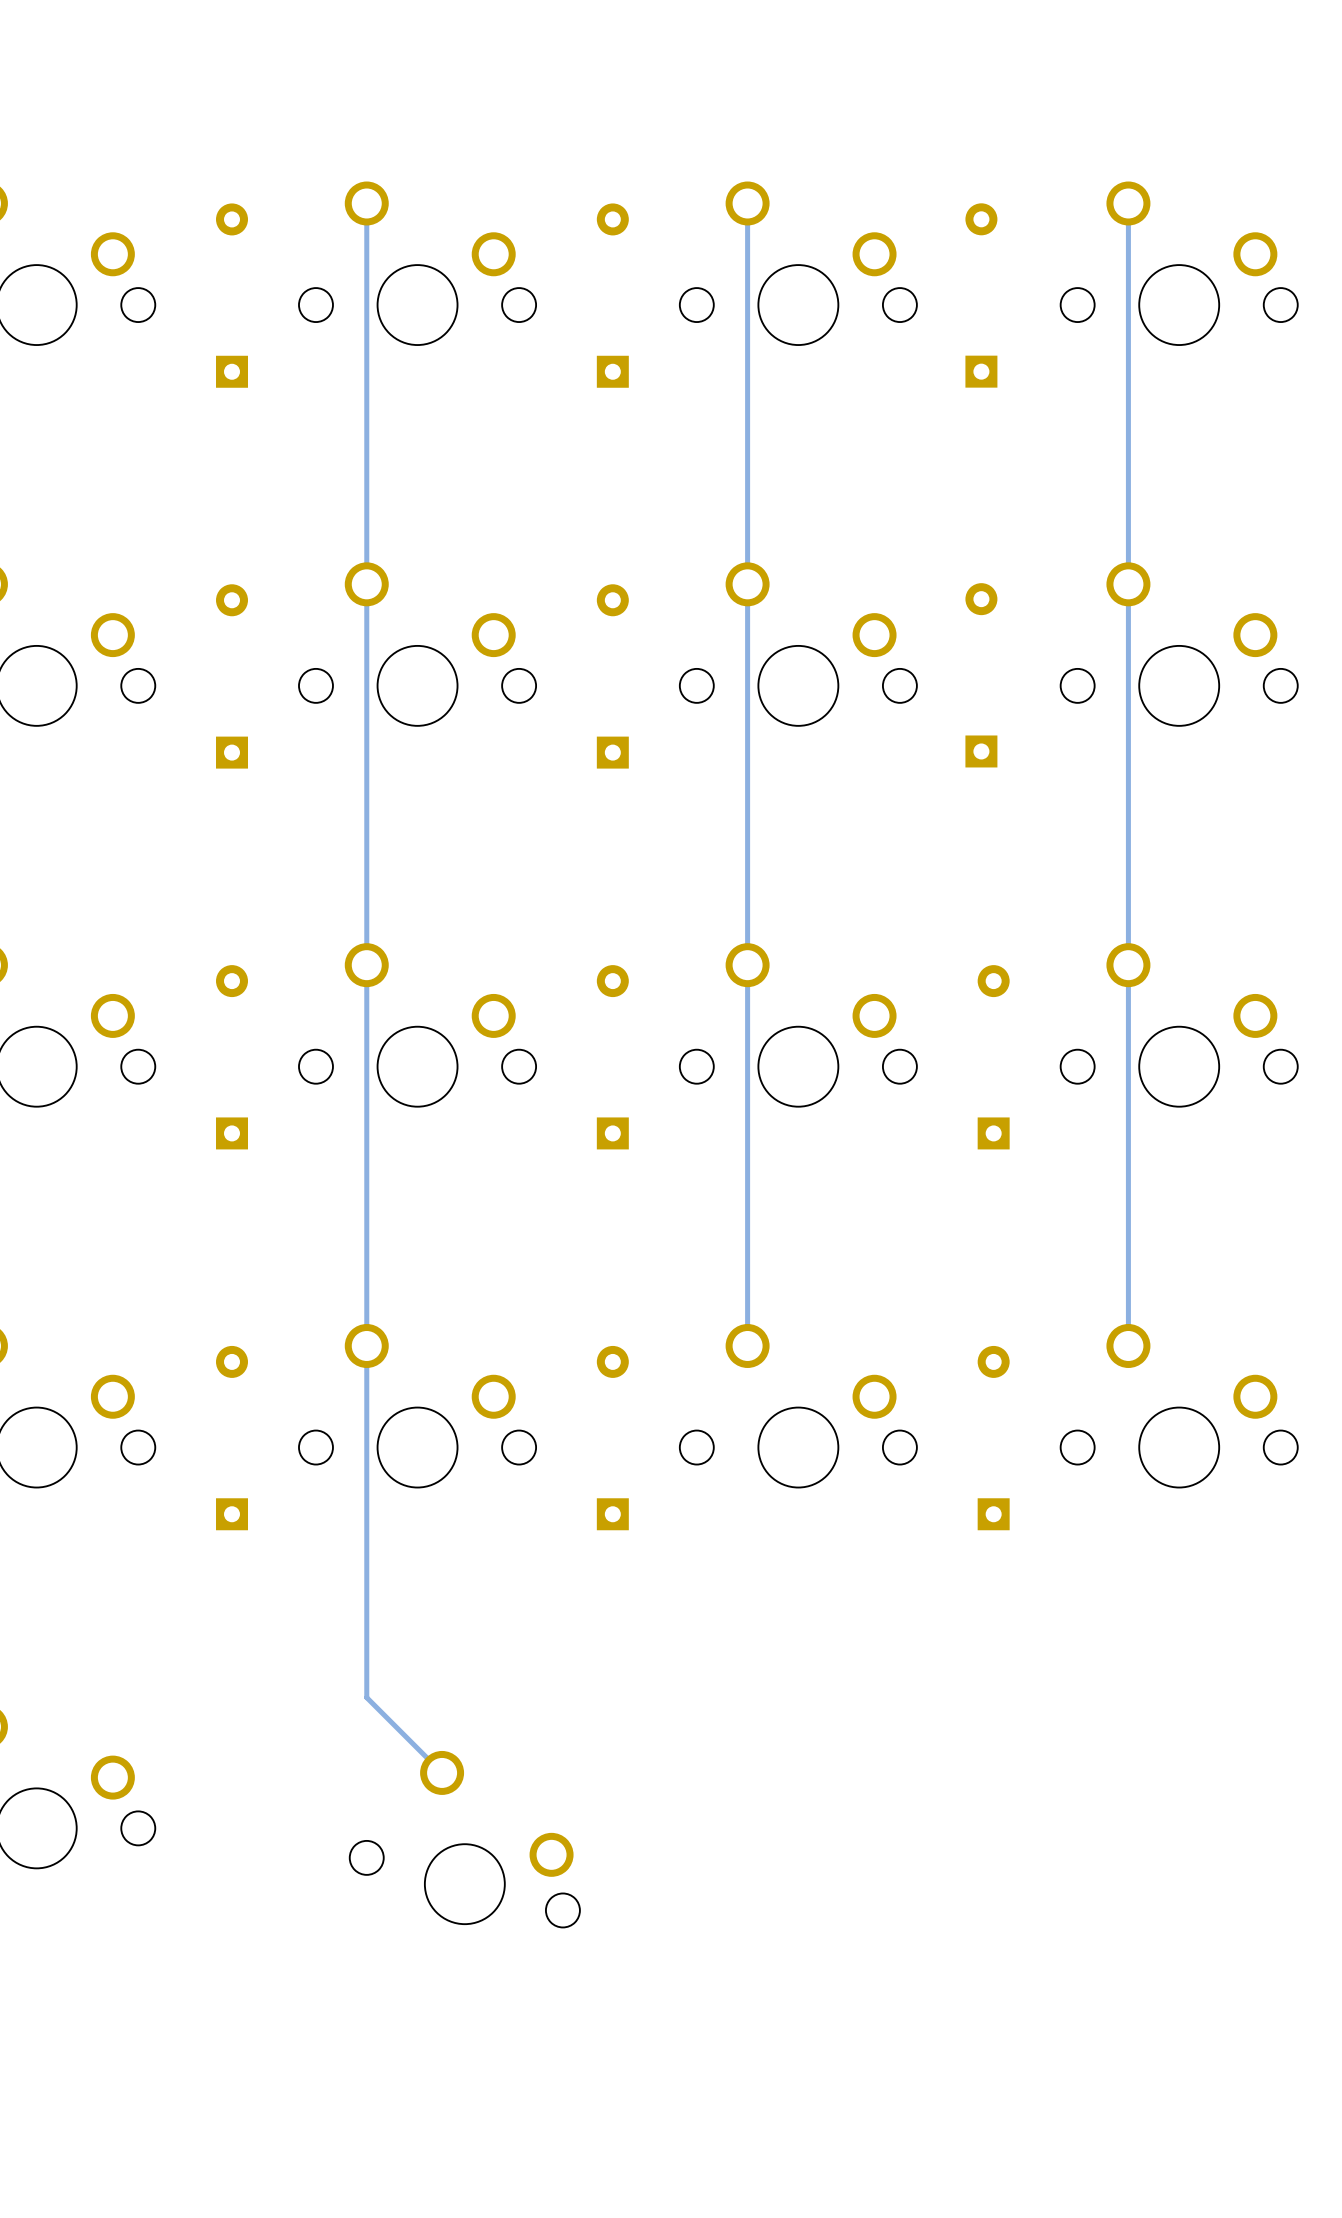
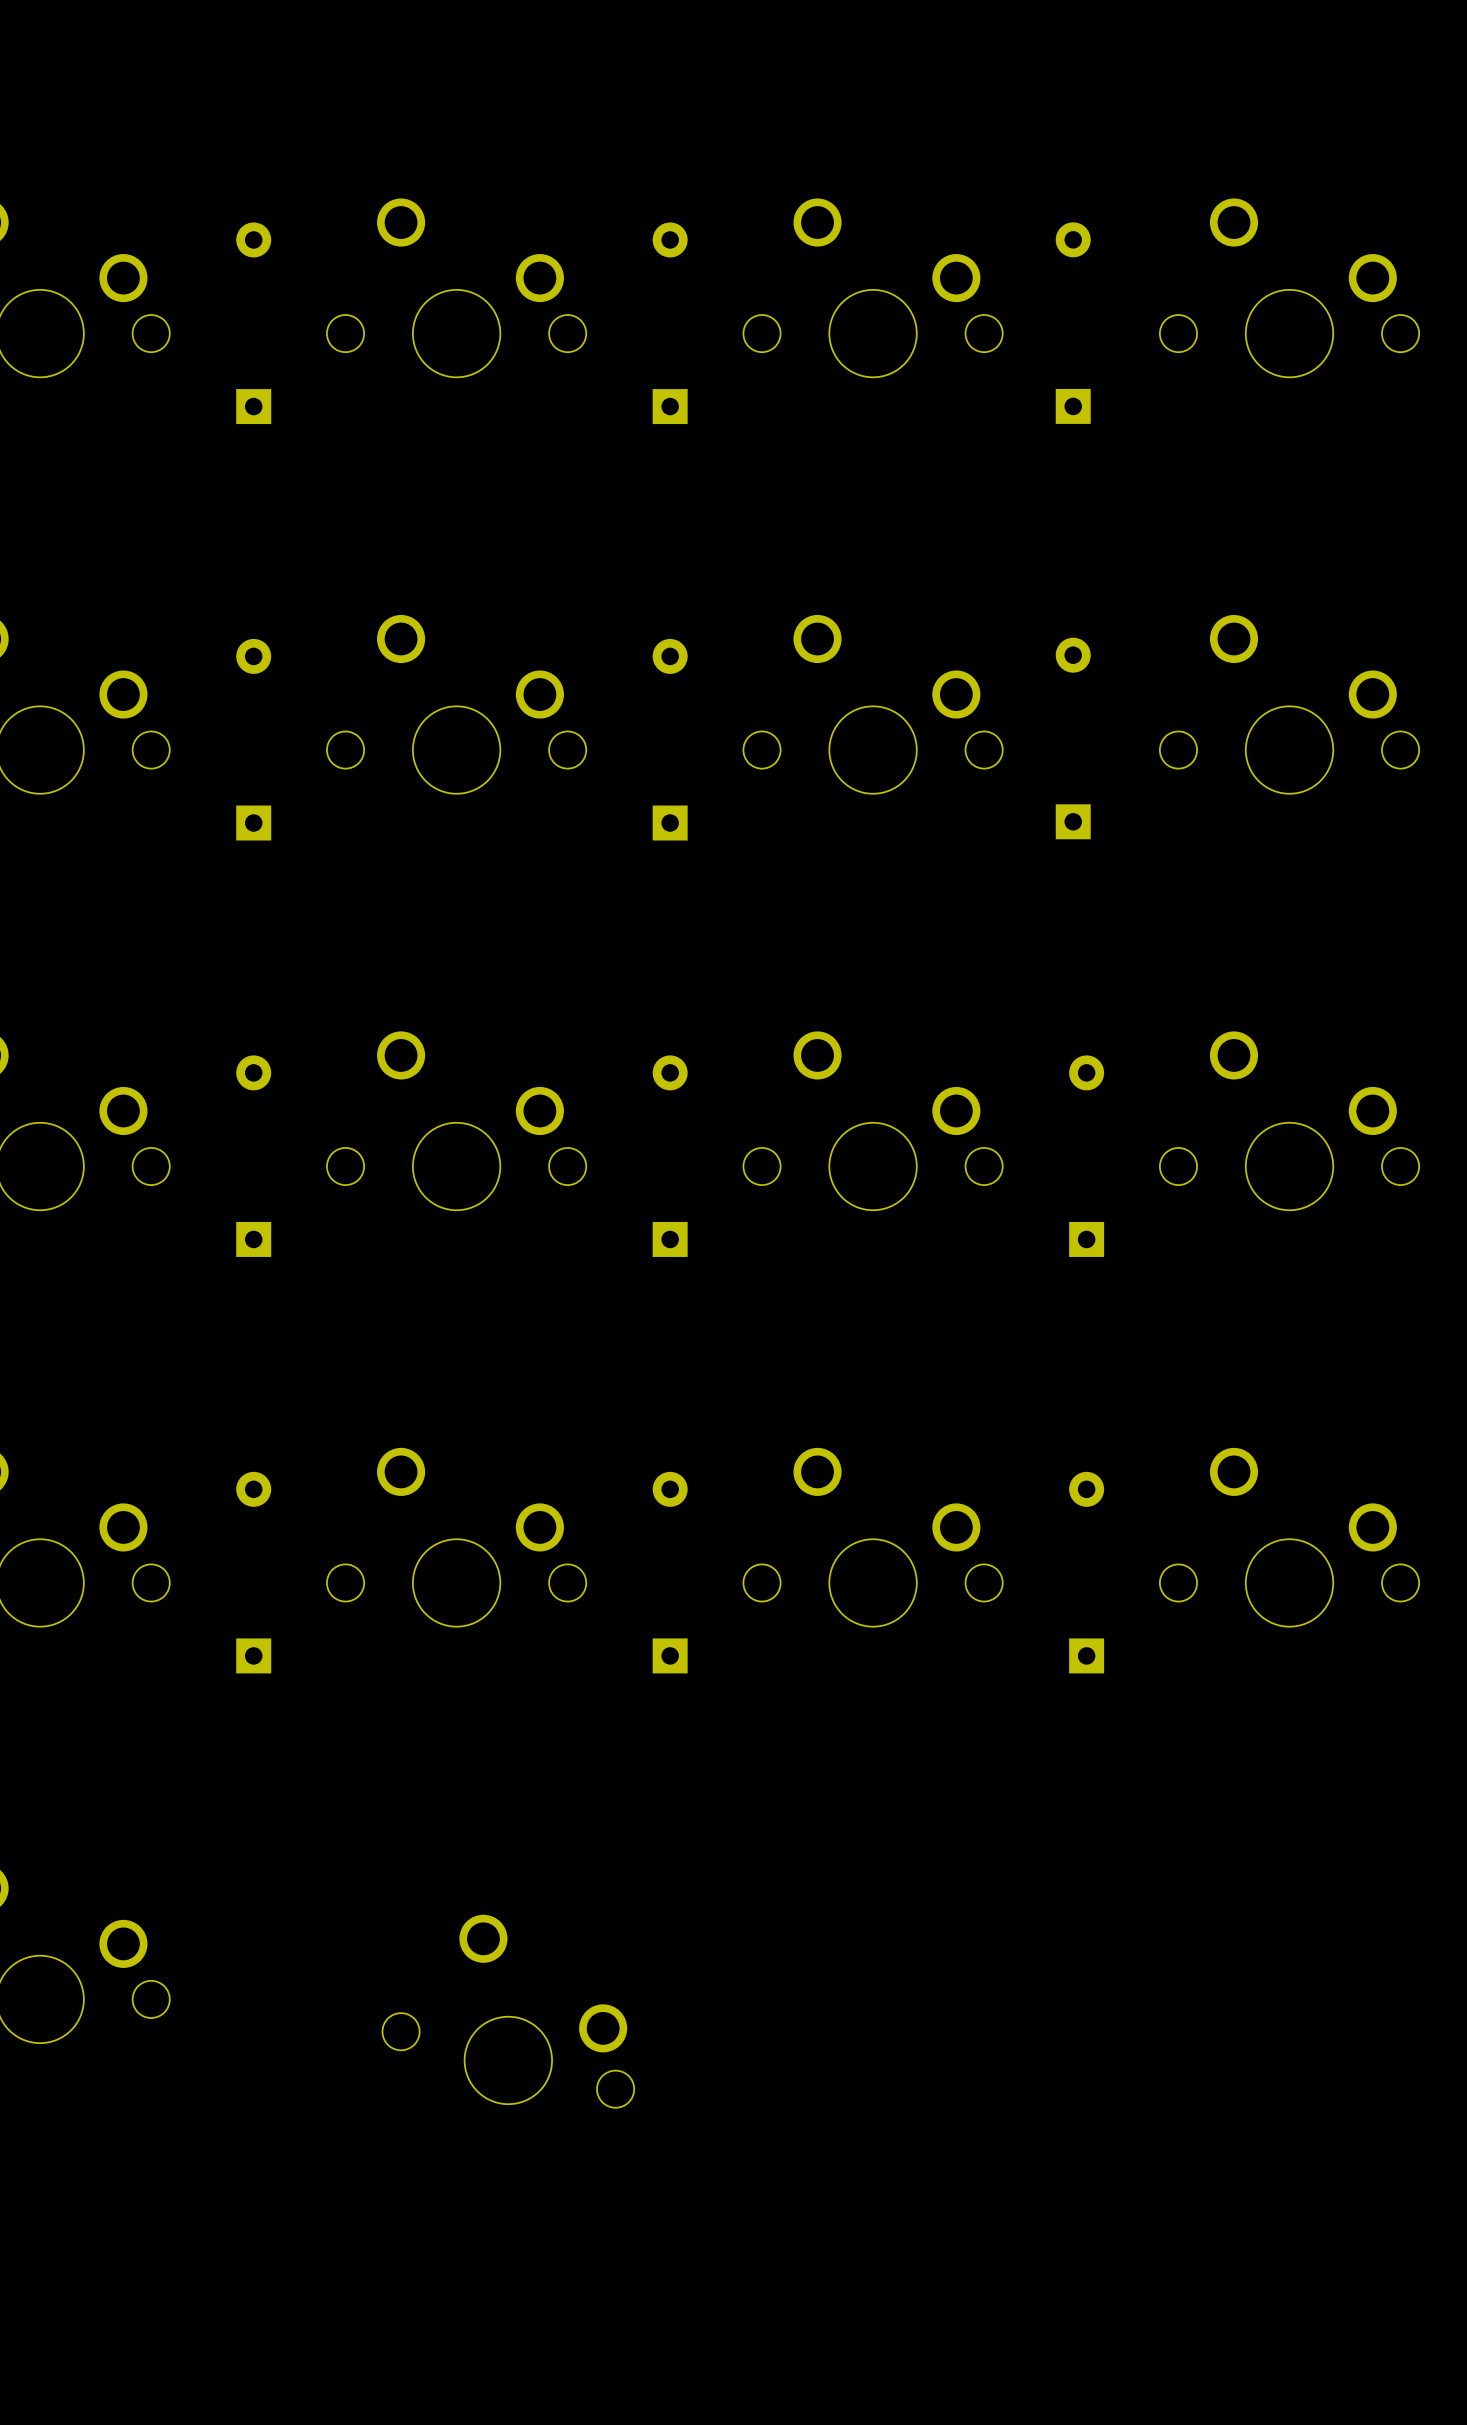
track: (366, 203) (366, 1697) (442, 1772) -> none
track: (747, 203) (747, 1345) -> none
track: (1128, 203) (1128, 1345) -> none

